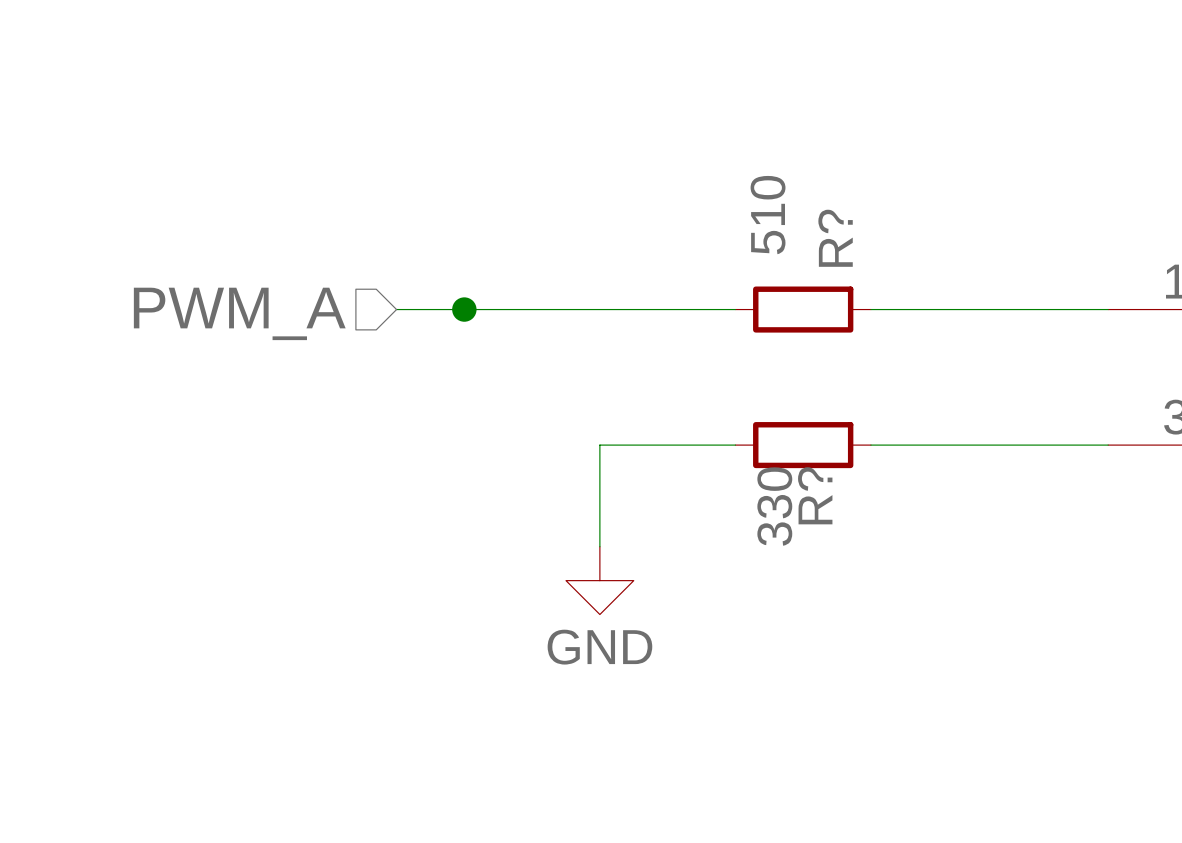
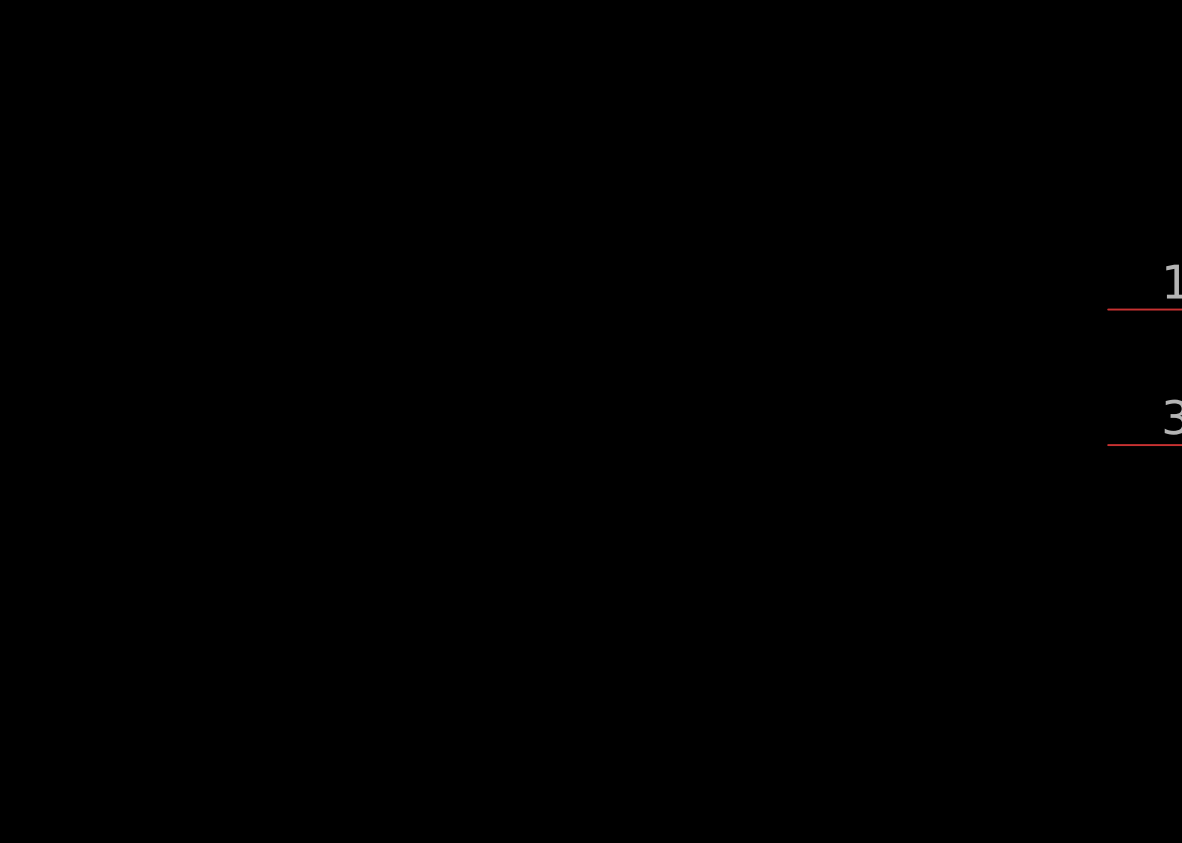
wire: (396, 309) (735, 309) -> none
junction: (464, 309) -> none
R?: 510 (803, 309) -> none
wire: (870, 309) (1108, 309) -> none
hierarchical label: PWM_A (239, 313) -> none
wire: (735, 445) (599, 445) (599, 546) -> none
R?: 330 (803, 445) -> none
wire: (870, 445) (1108, 445) -> none
power symbol: GND (599, 580) -> none

